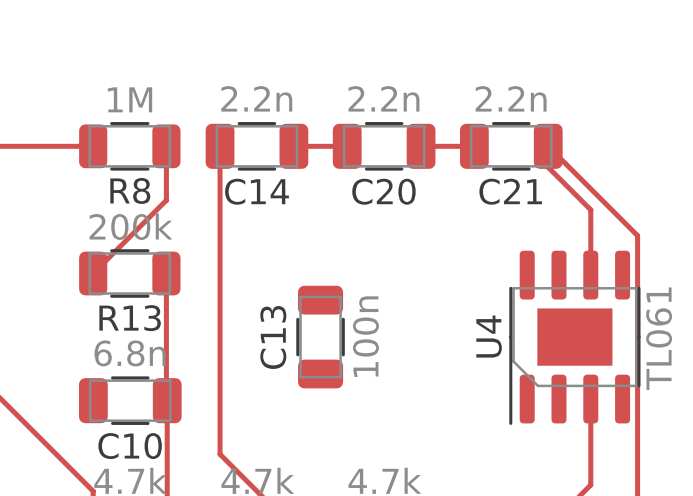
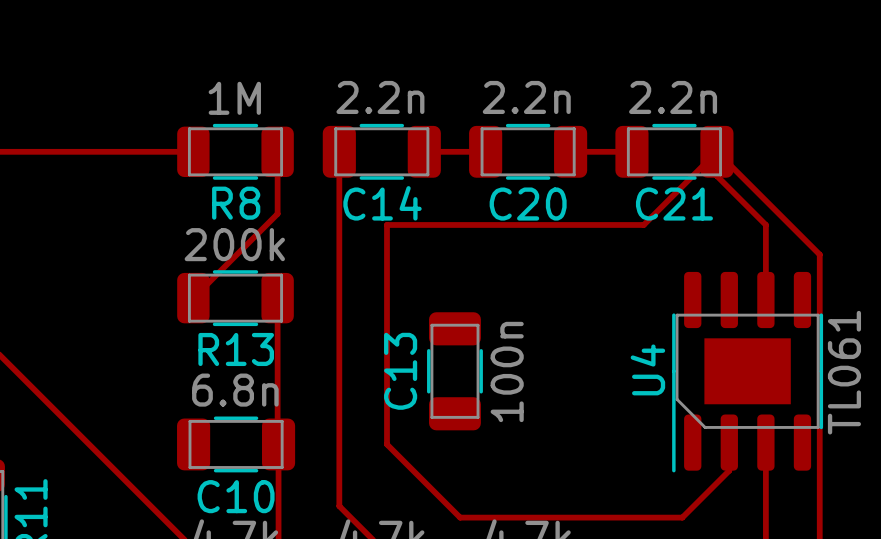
track: none -> (716, 151) (643, 224) (387, 224) (387, 444) (460, 517) (682, 517) (729, 470) (729, 442)

